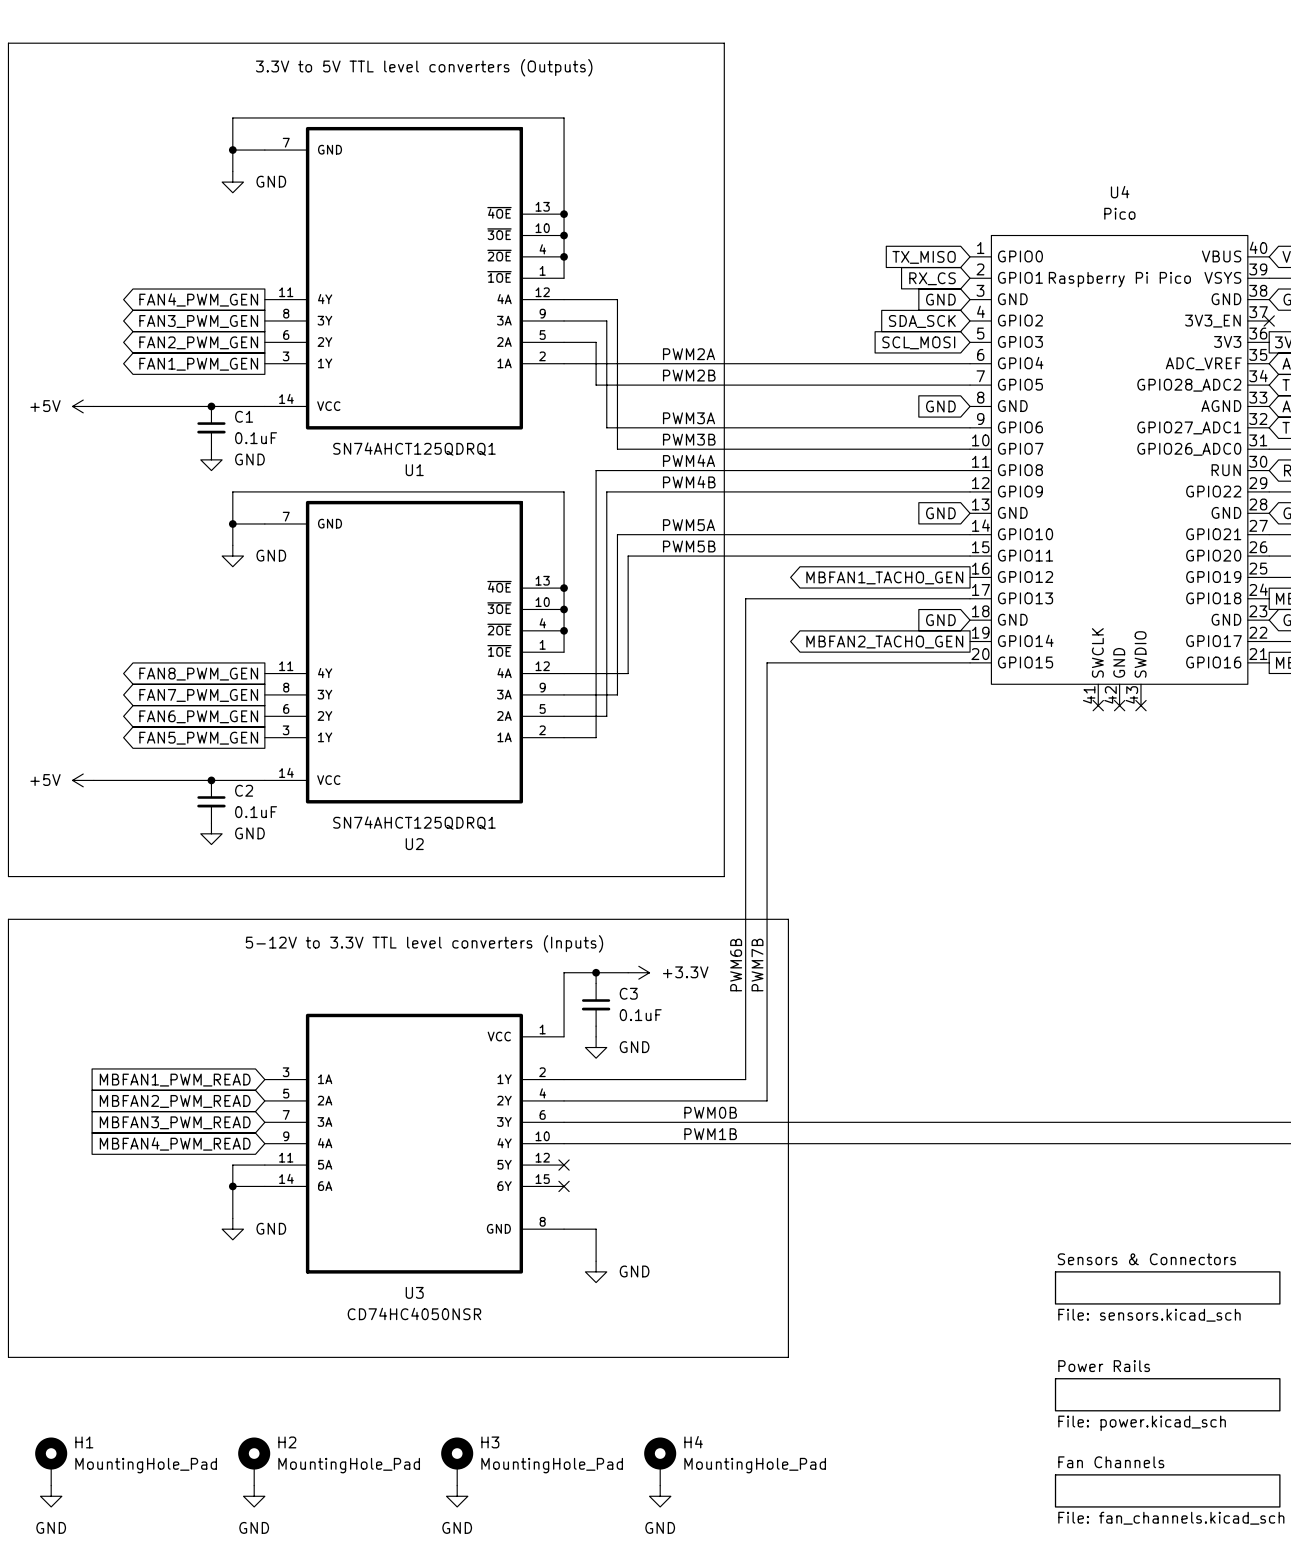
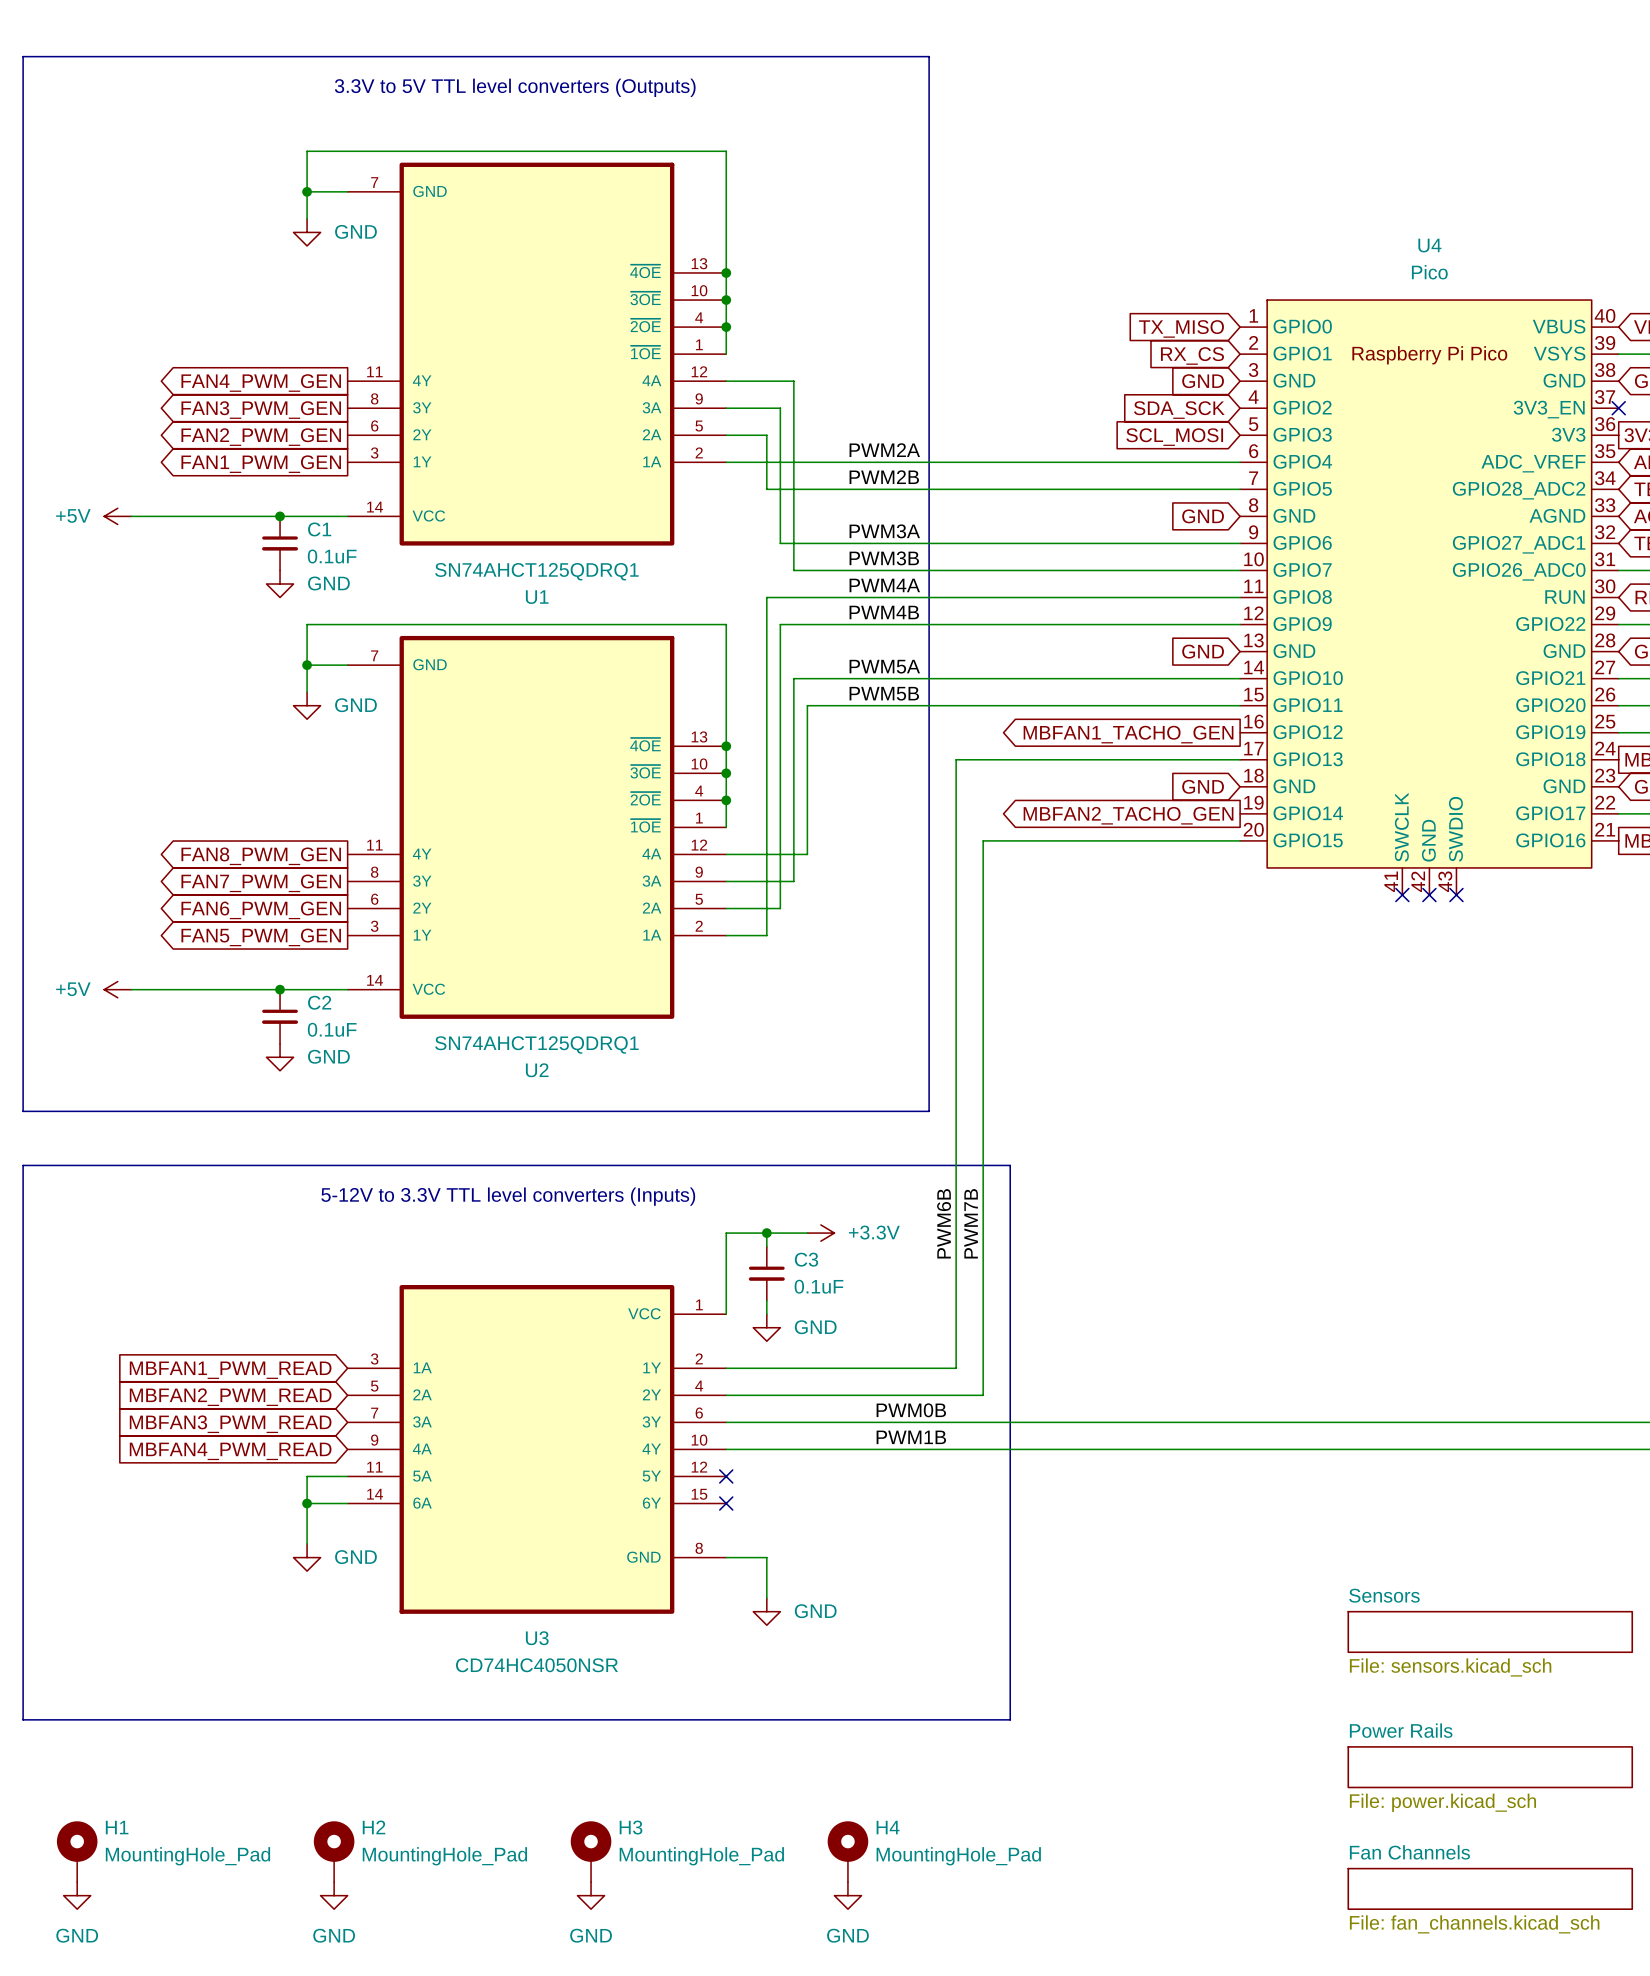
sheet Sensors & Connectors name: Sensors & Connectors (1146, 1259) -> Sensors (1384, 1595)

